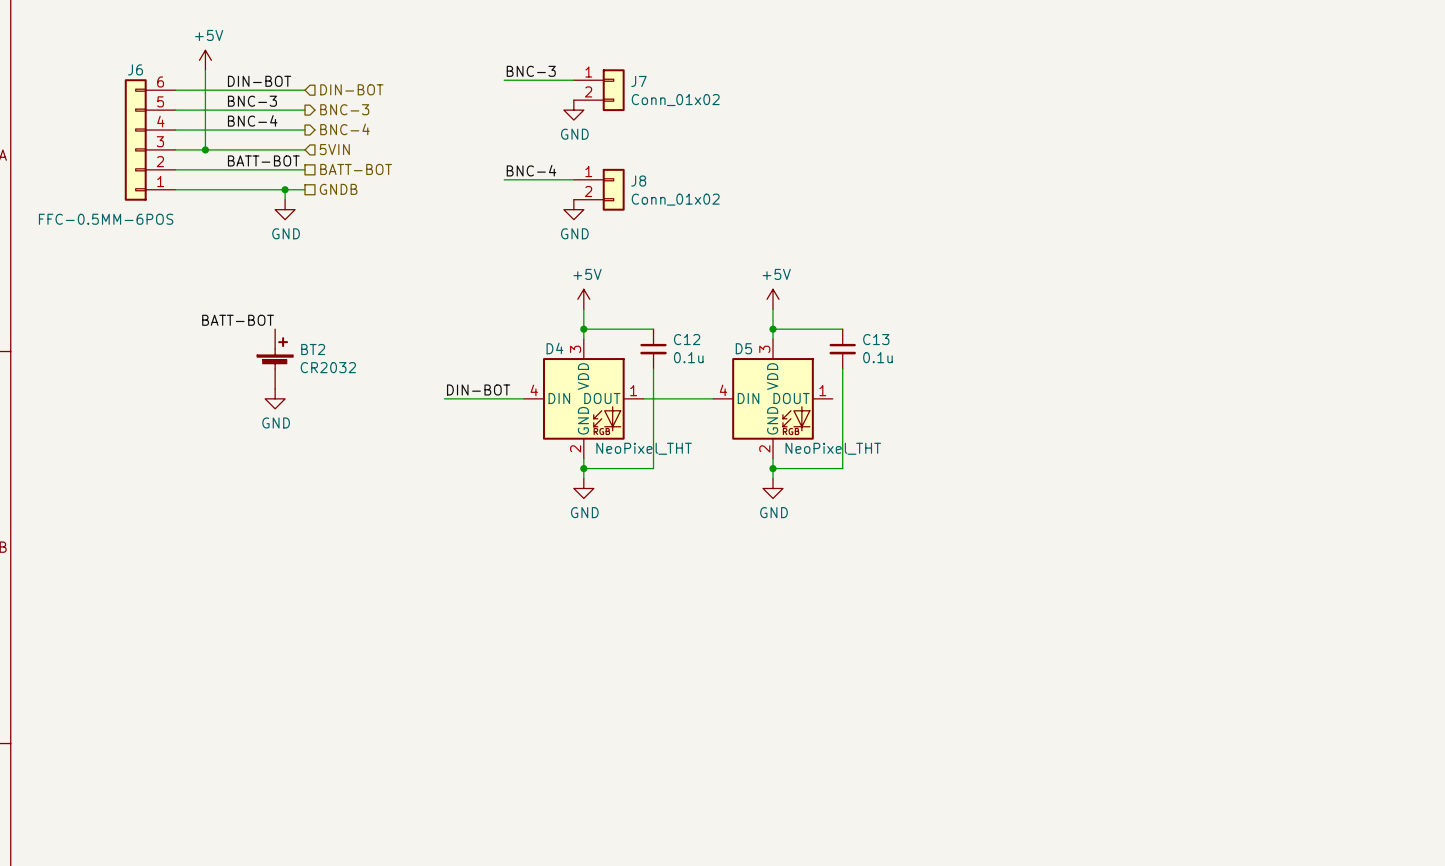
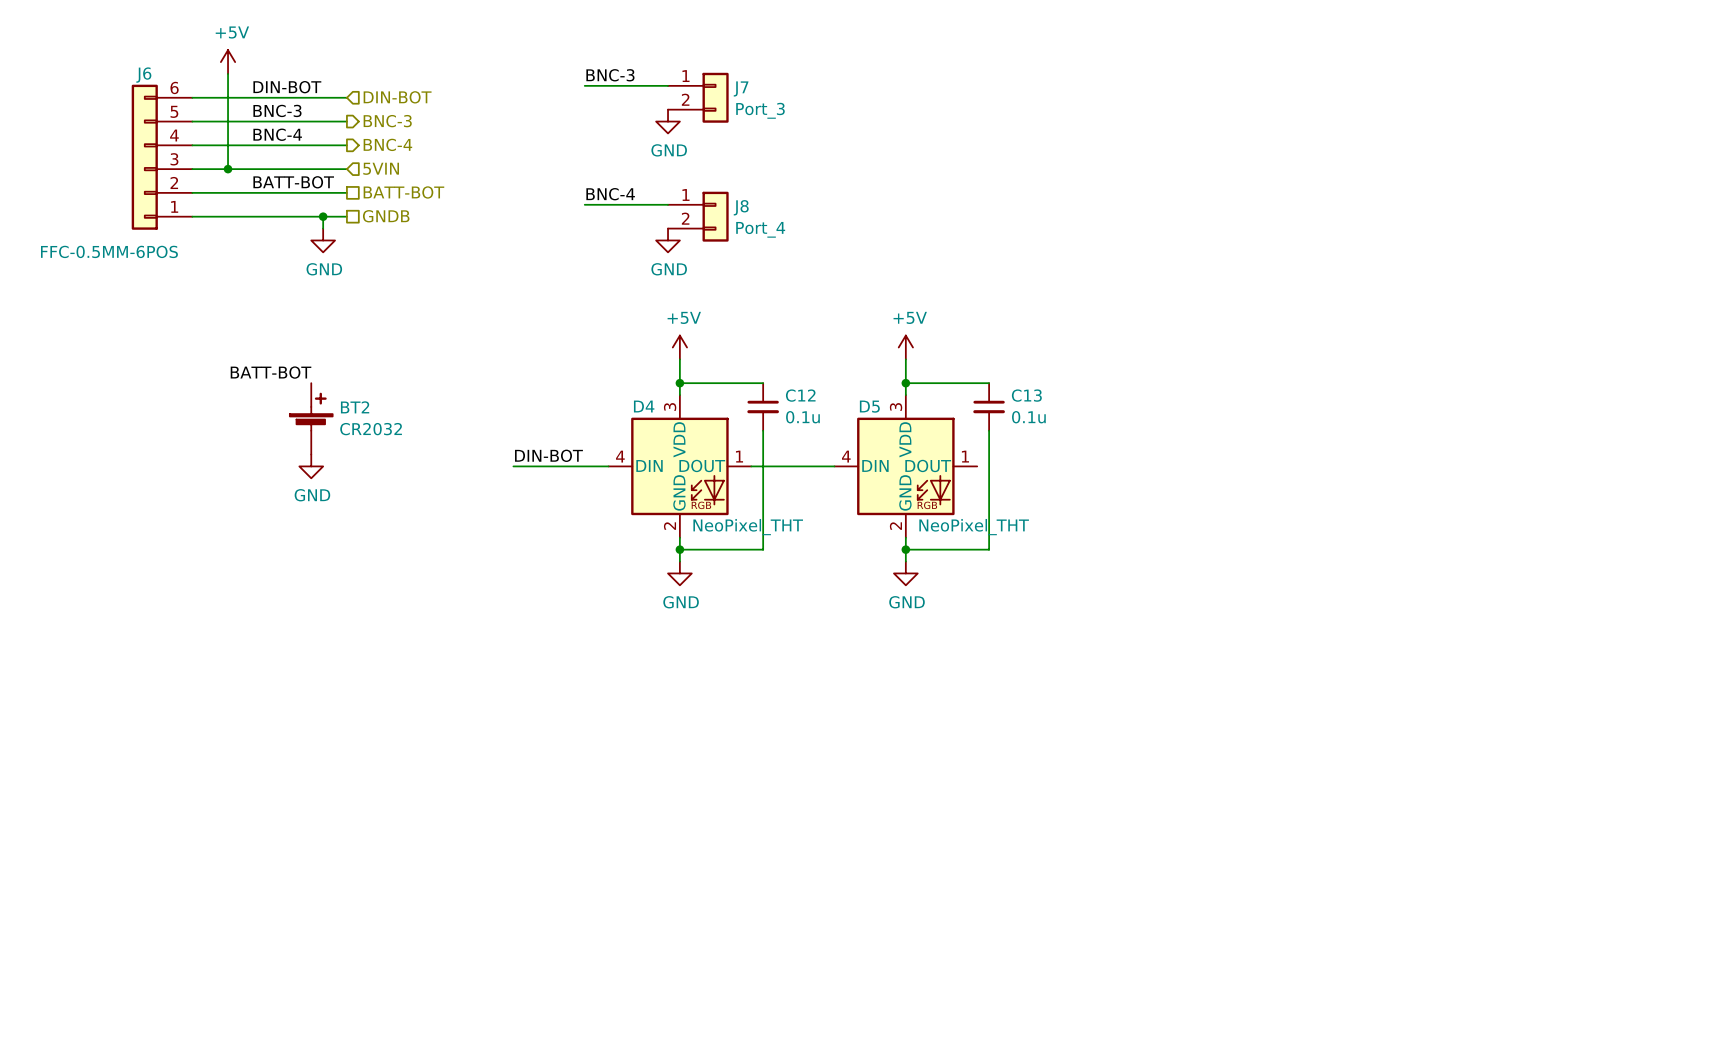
J7 value: Conn_01x02 (675, 100) -> Port_3 (760, 110)
J8 value: Conn_01x02 (675, 199) -> Port_4 (760, 229)

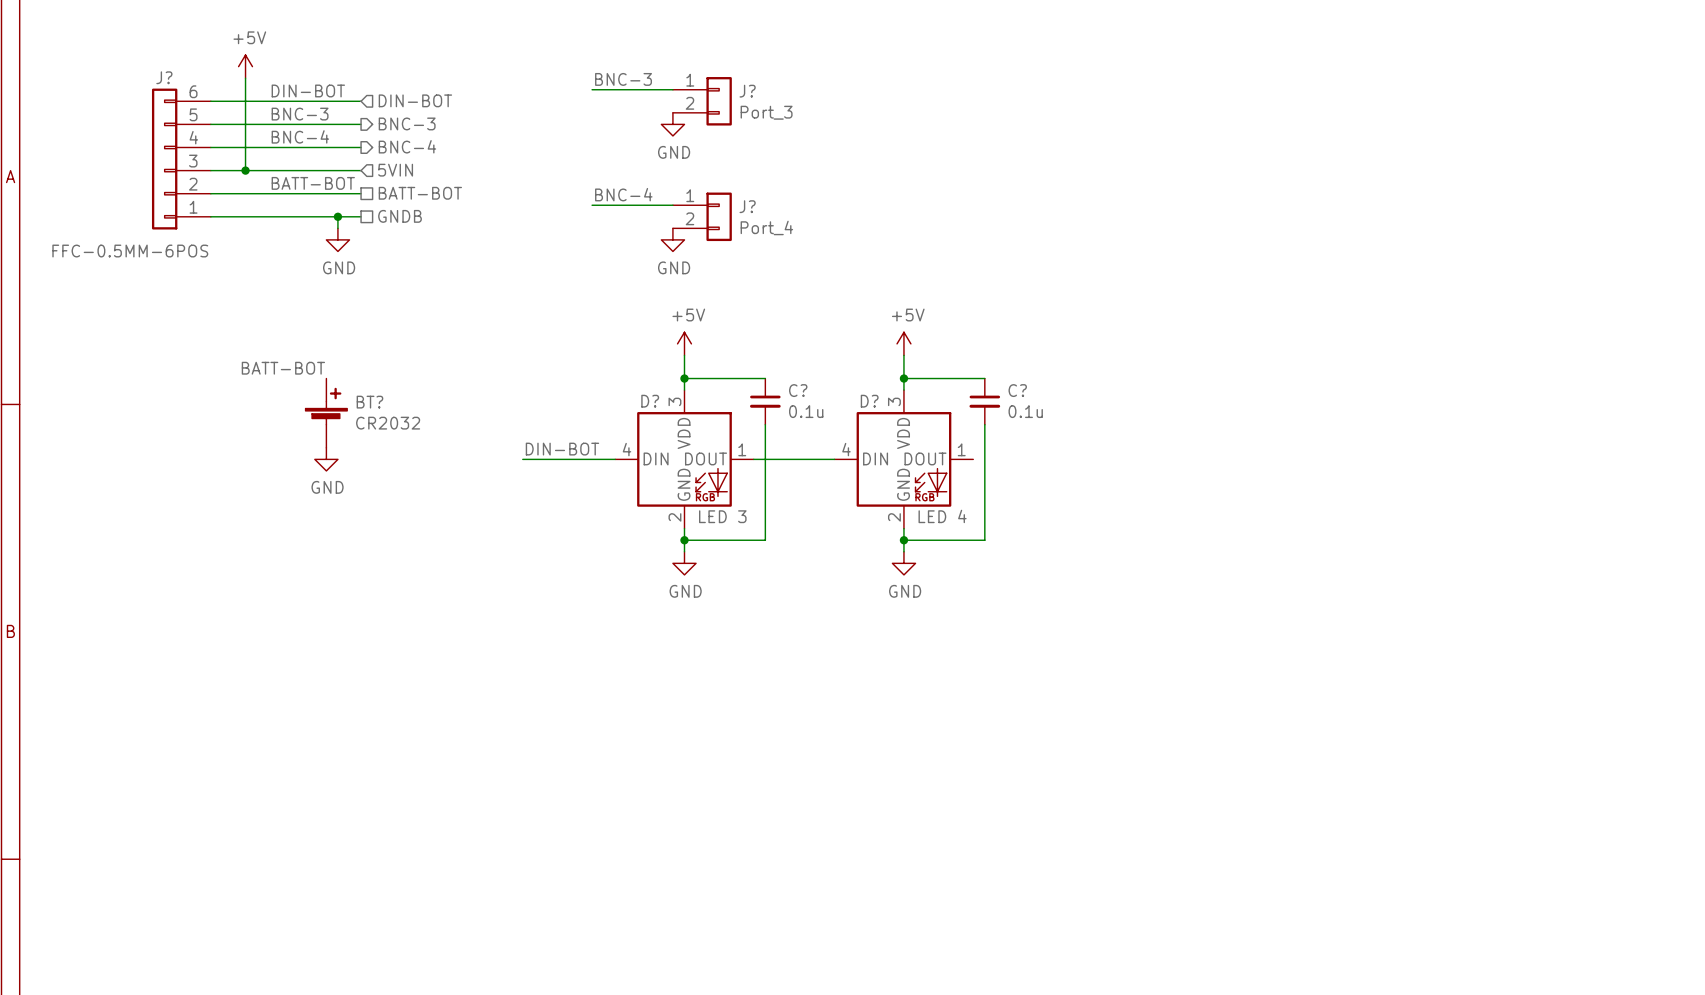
J6 name: J6 (143, 75) -> J? (164, 77)
J7 name: J7 (741, 88) -> J? (747, 91)
J8 name: J8 (741, 207) -> J? (747, 206)
C12 name: C12 (800, 395) -> C? (798, 390)
C13 name: C13 (1026, 395) -> C? (1017, 390)
D4 name: D4 (644, 406) -> D? (650, 401)
D5 name: D5 (869, 406) -> D? (869, 401)
BT2 name: BT2 (355, 407) -> BT? (369, 402)
D4 value: NeoPixel_THT (748, 527) -> LED 3 (722, 516)
D5 value: NeoPixel_THT (974, 527) -> LED 4 (942, 516)

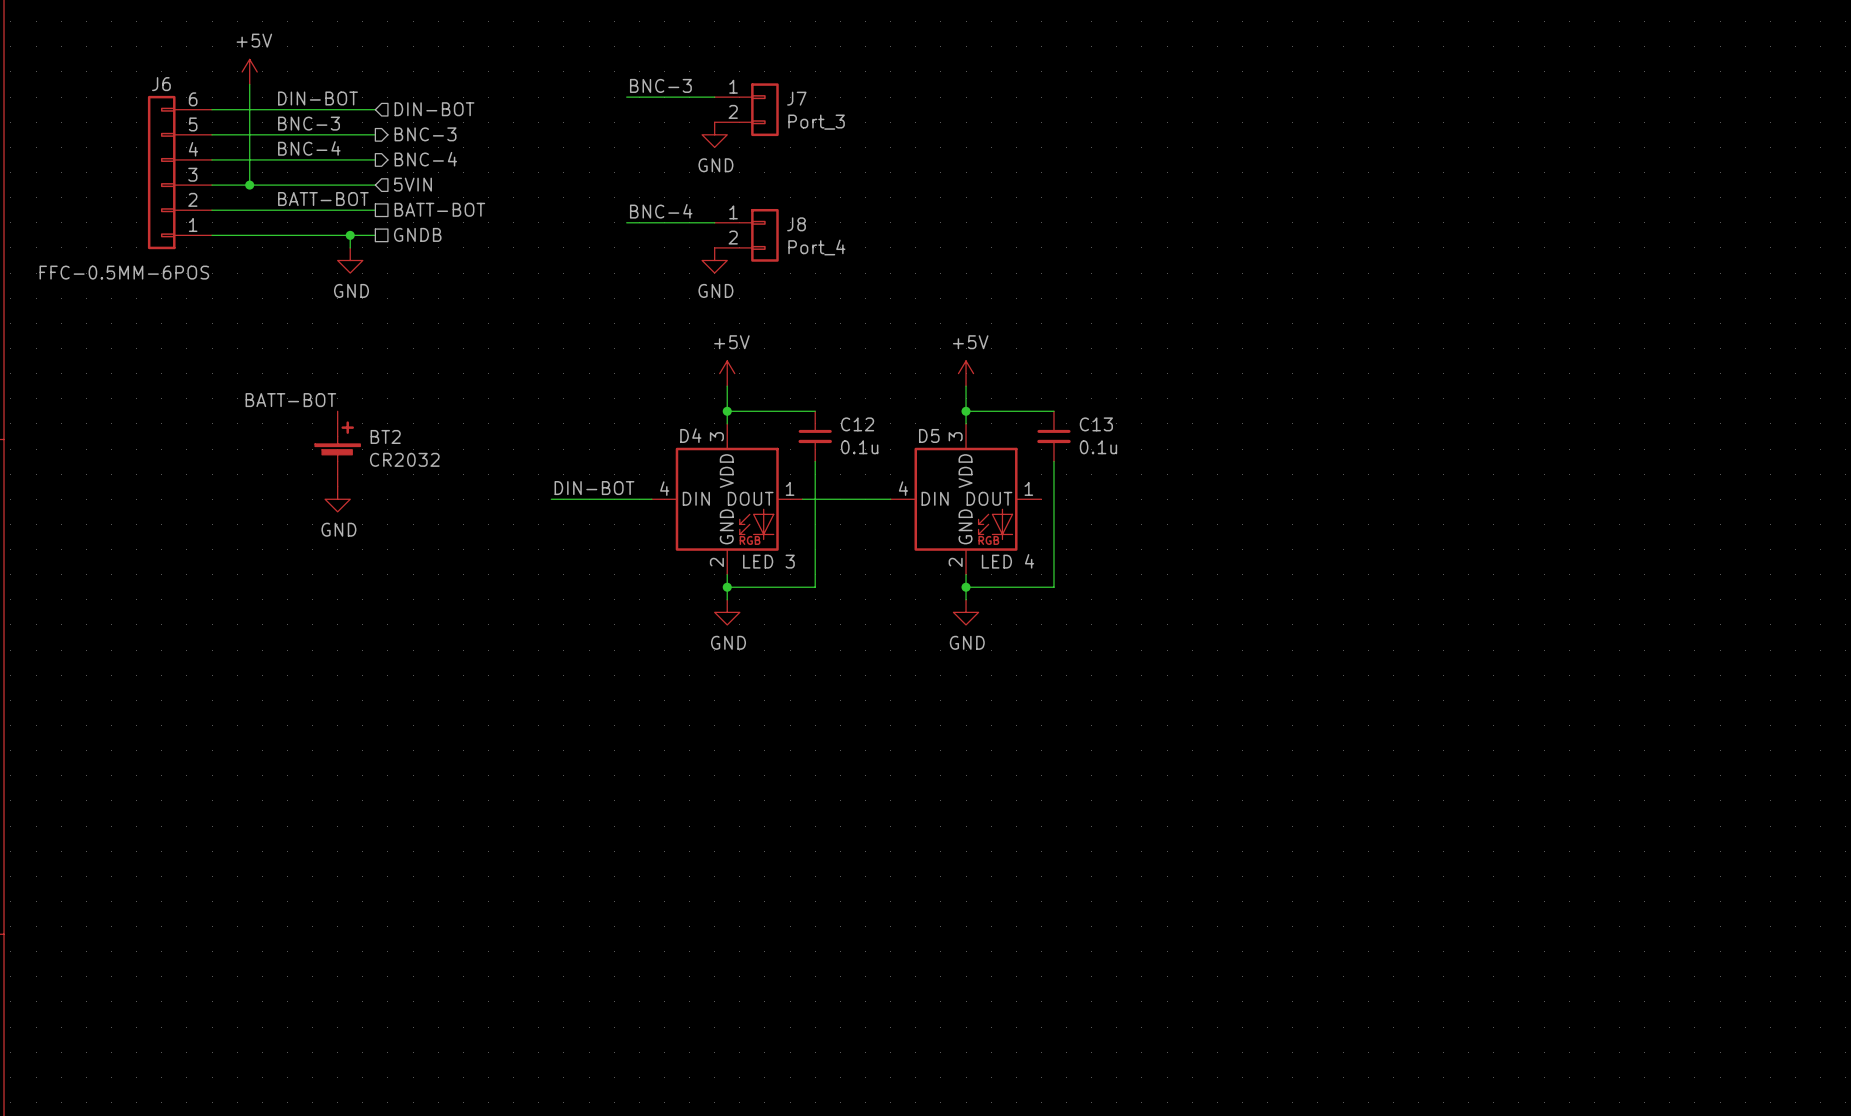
J? name: J? (164, 77) -> J6 (161, 84)
J? name: J? (747, 91) -> J7 (796, 98)
J? name: J? (747, 206) -> J8 (796, 224)
C? name: C? (798, 390) -> C12 (857, 424)
C? name: C? (1017, 390) -> C13 (1096, 424)
D? name: D? (650, 401) -> D4 (690, 435)
D? name: D? (869, 401) -> D5 (929, 435)
BT? name: BT? (369, 402) -> BT2 (385, 436)

